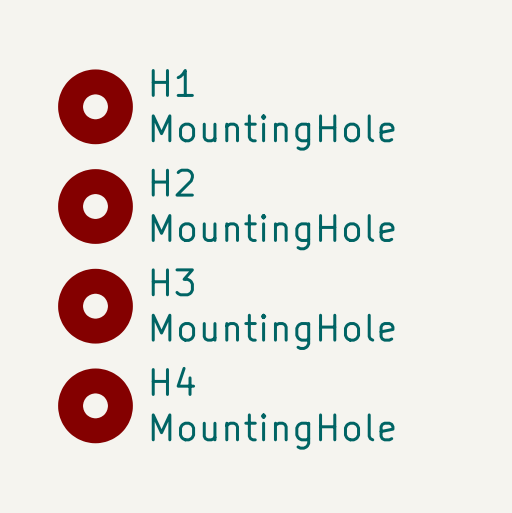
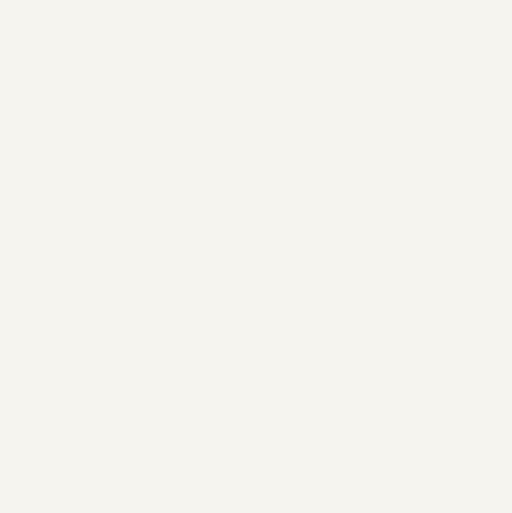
H1: MountingHole (95, 106) -> none
H2: MountingHole (95, 206) -> none
H3: MountingHole (95, 306) -> none
H4: MountingHole (95, 405) -> none

